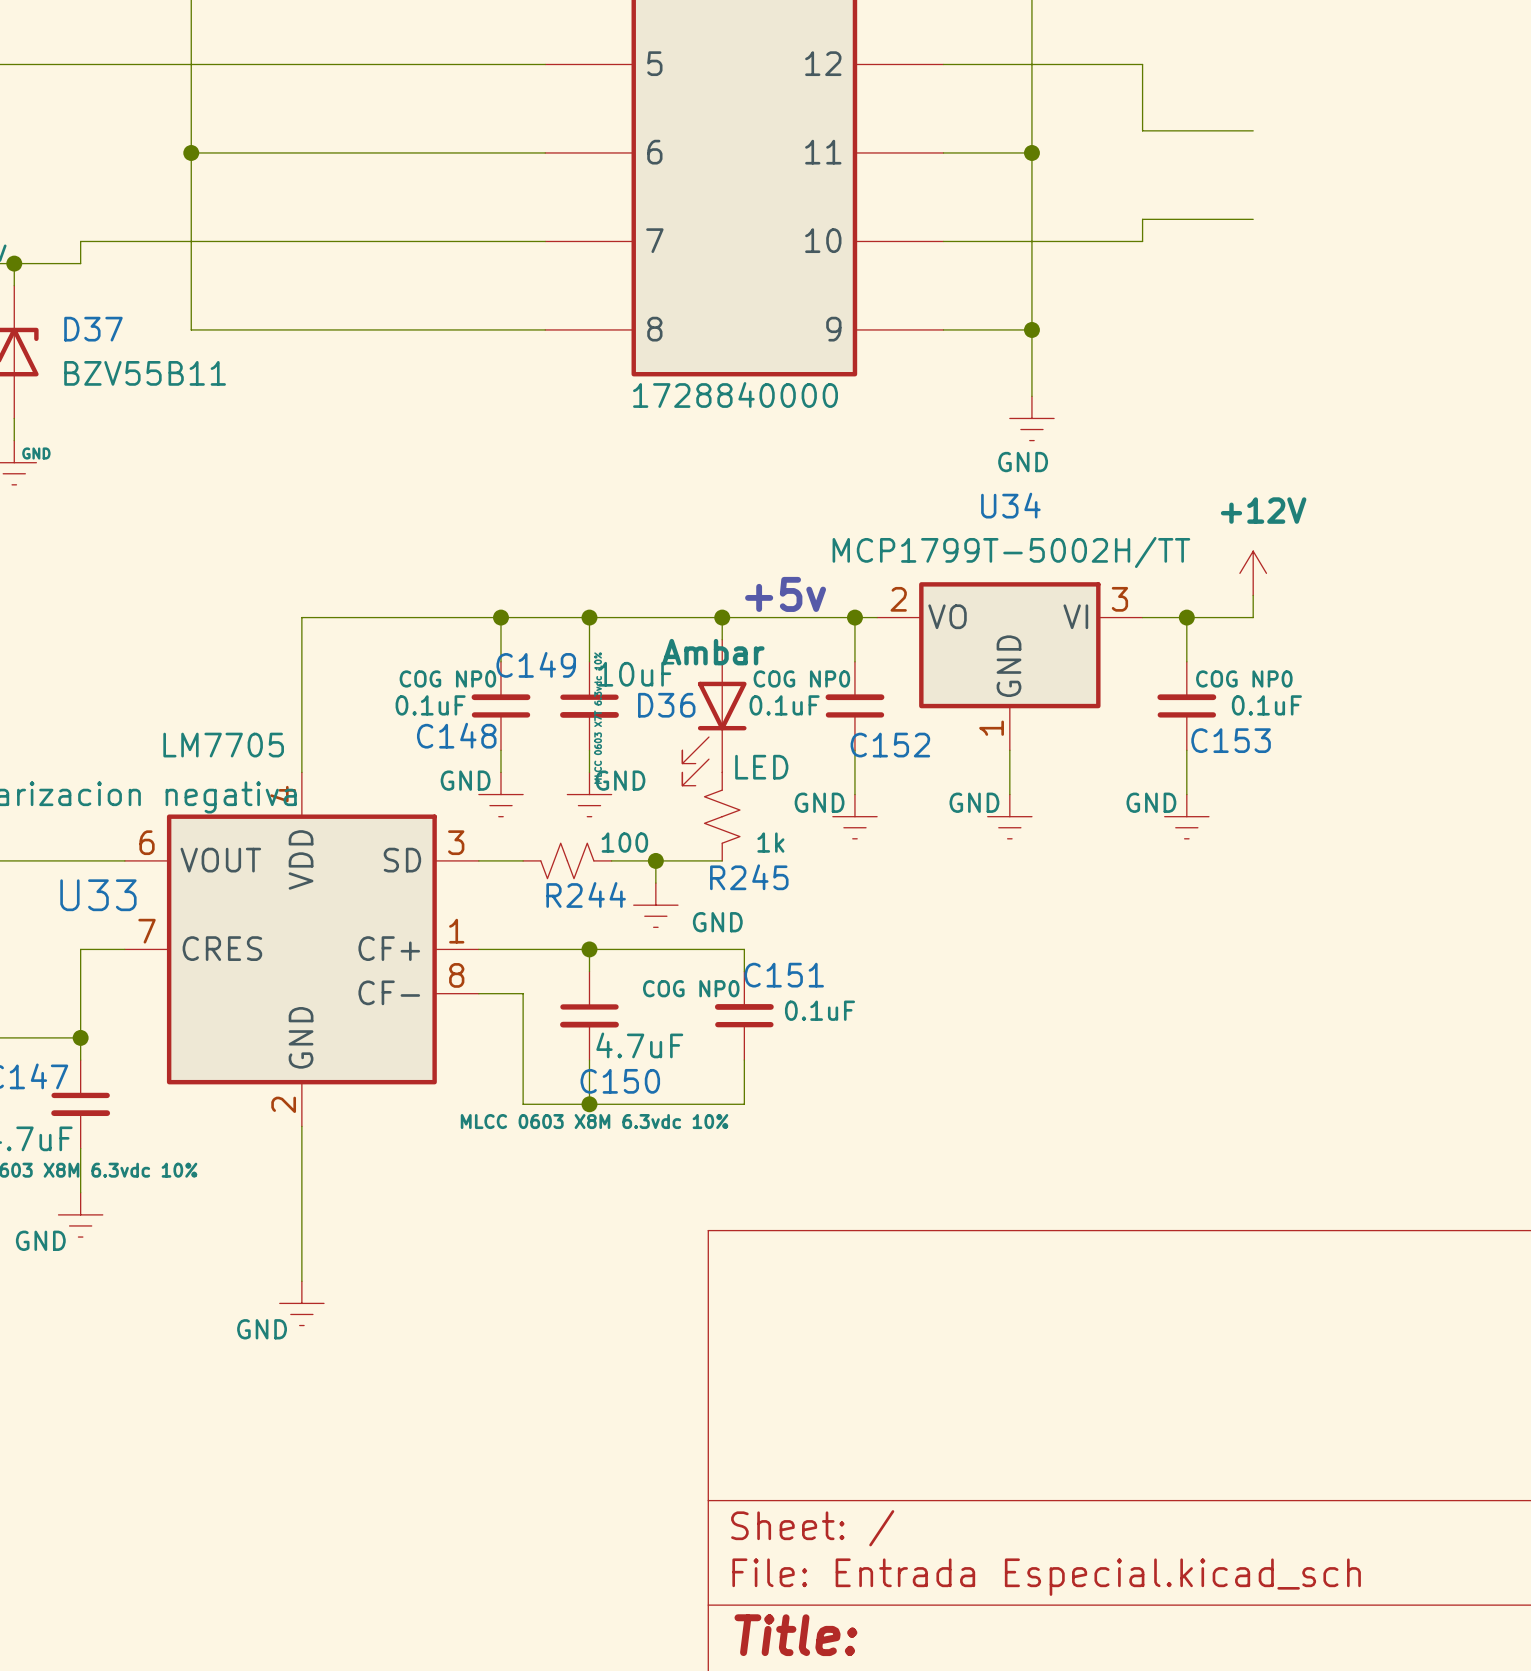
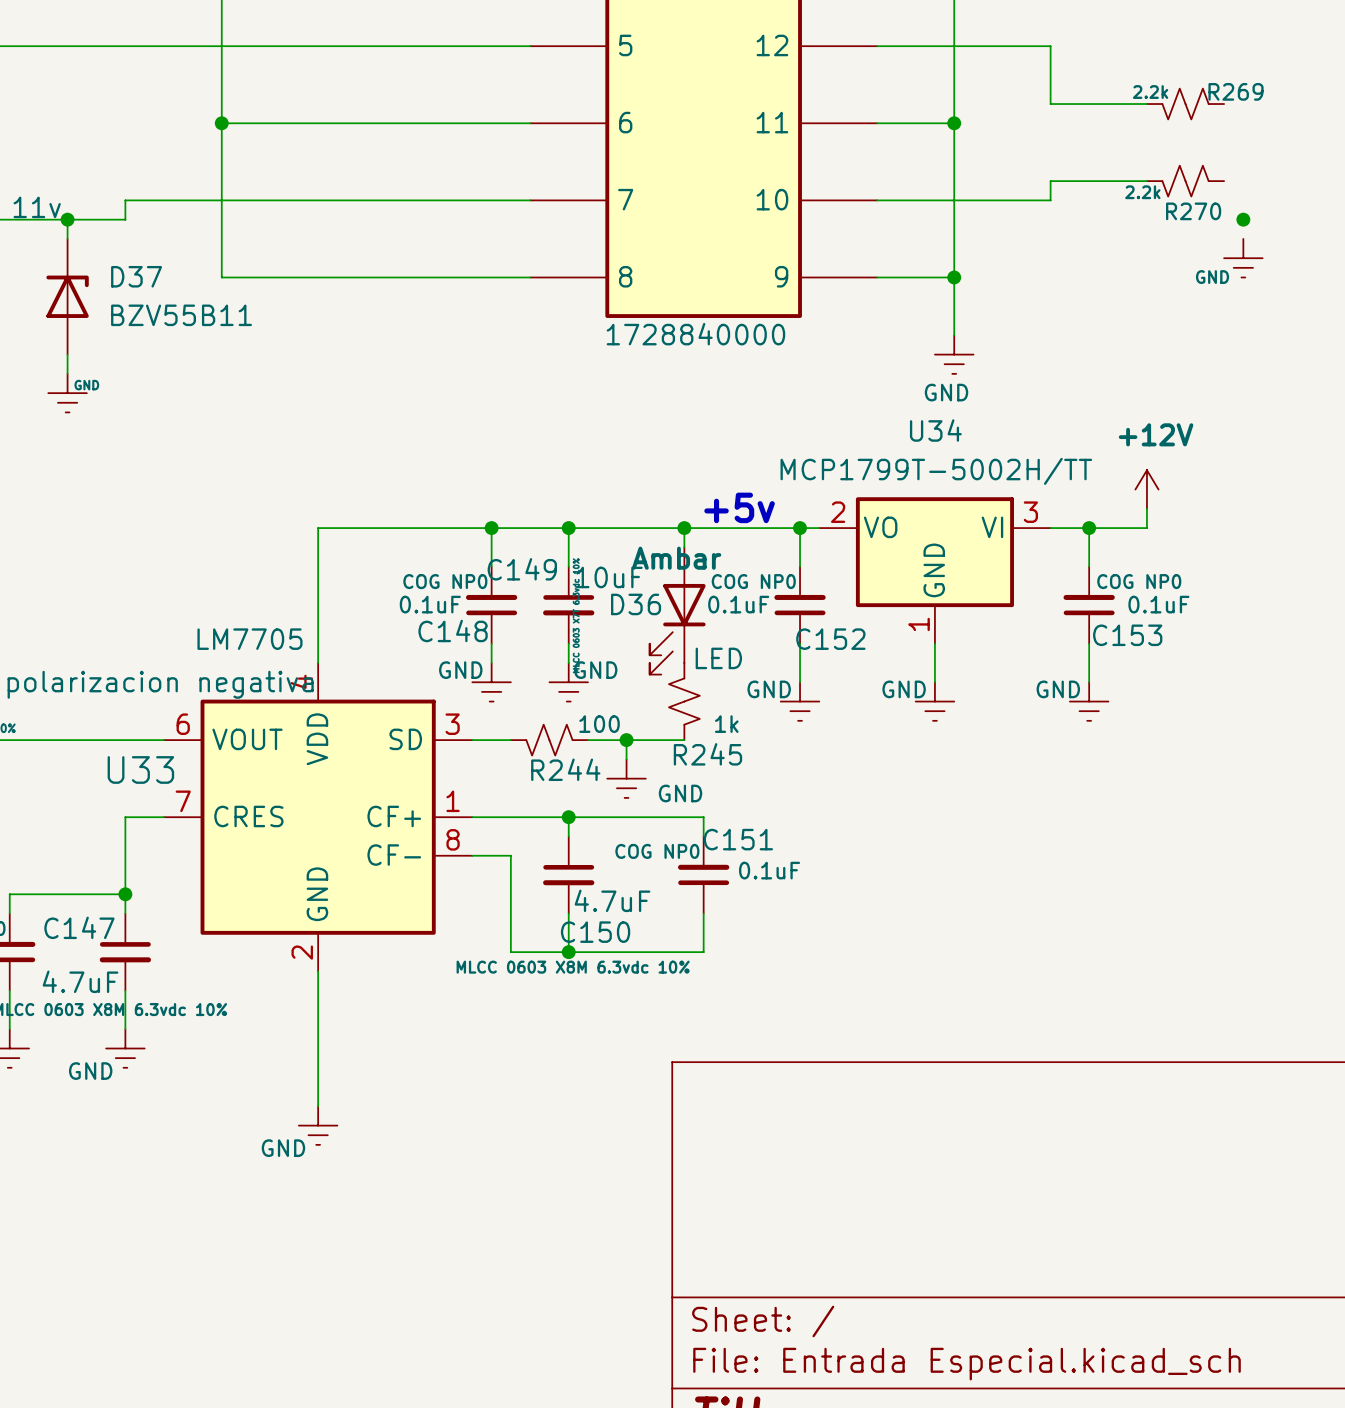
R269: none -> 2.2k (1185, 104)
R270: none -> 2.2k (1185, 181)
junction: none -> (1243, 219)
power symbol: none -> GND (1243, 258)

